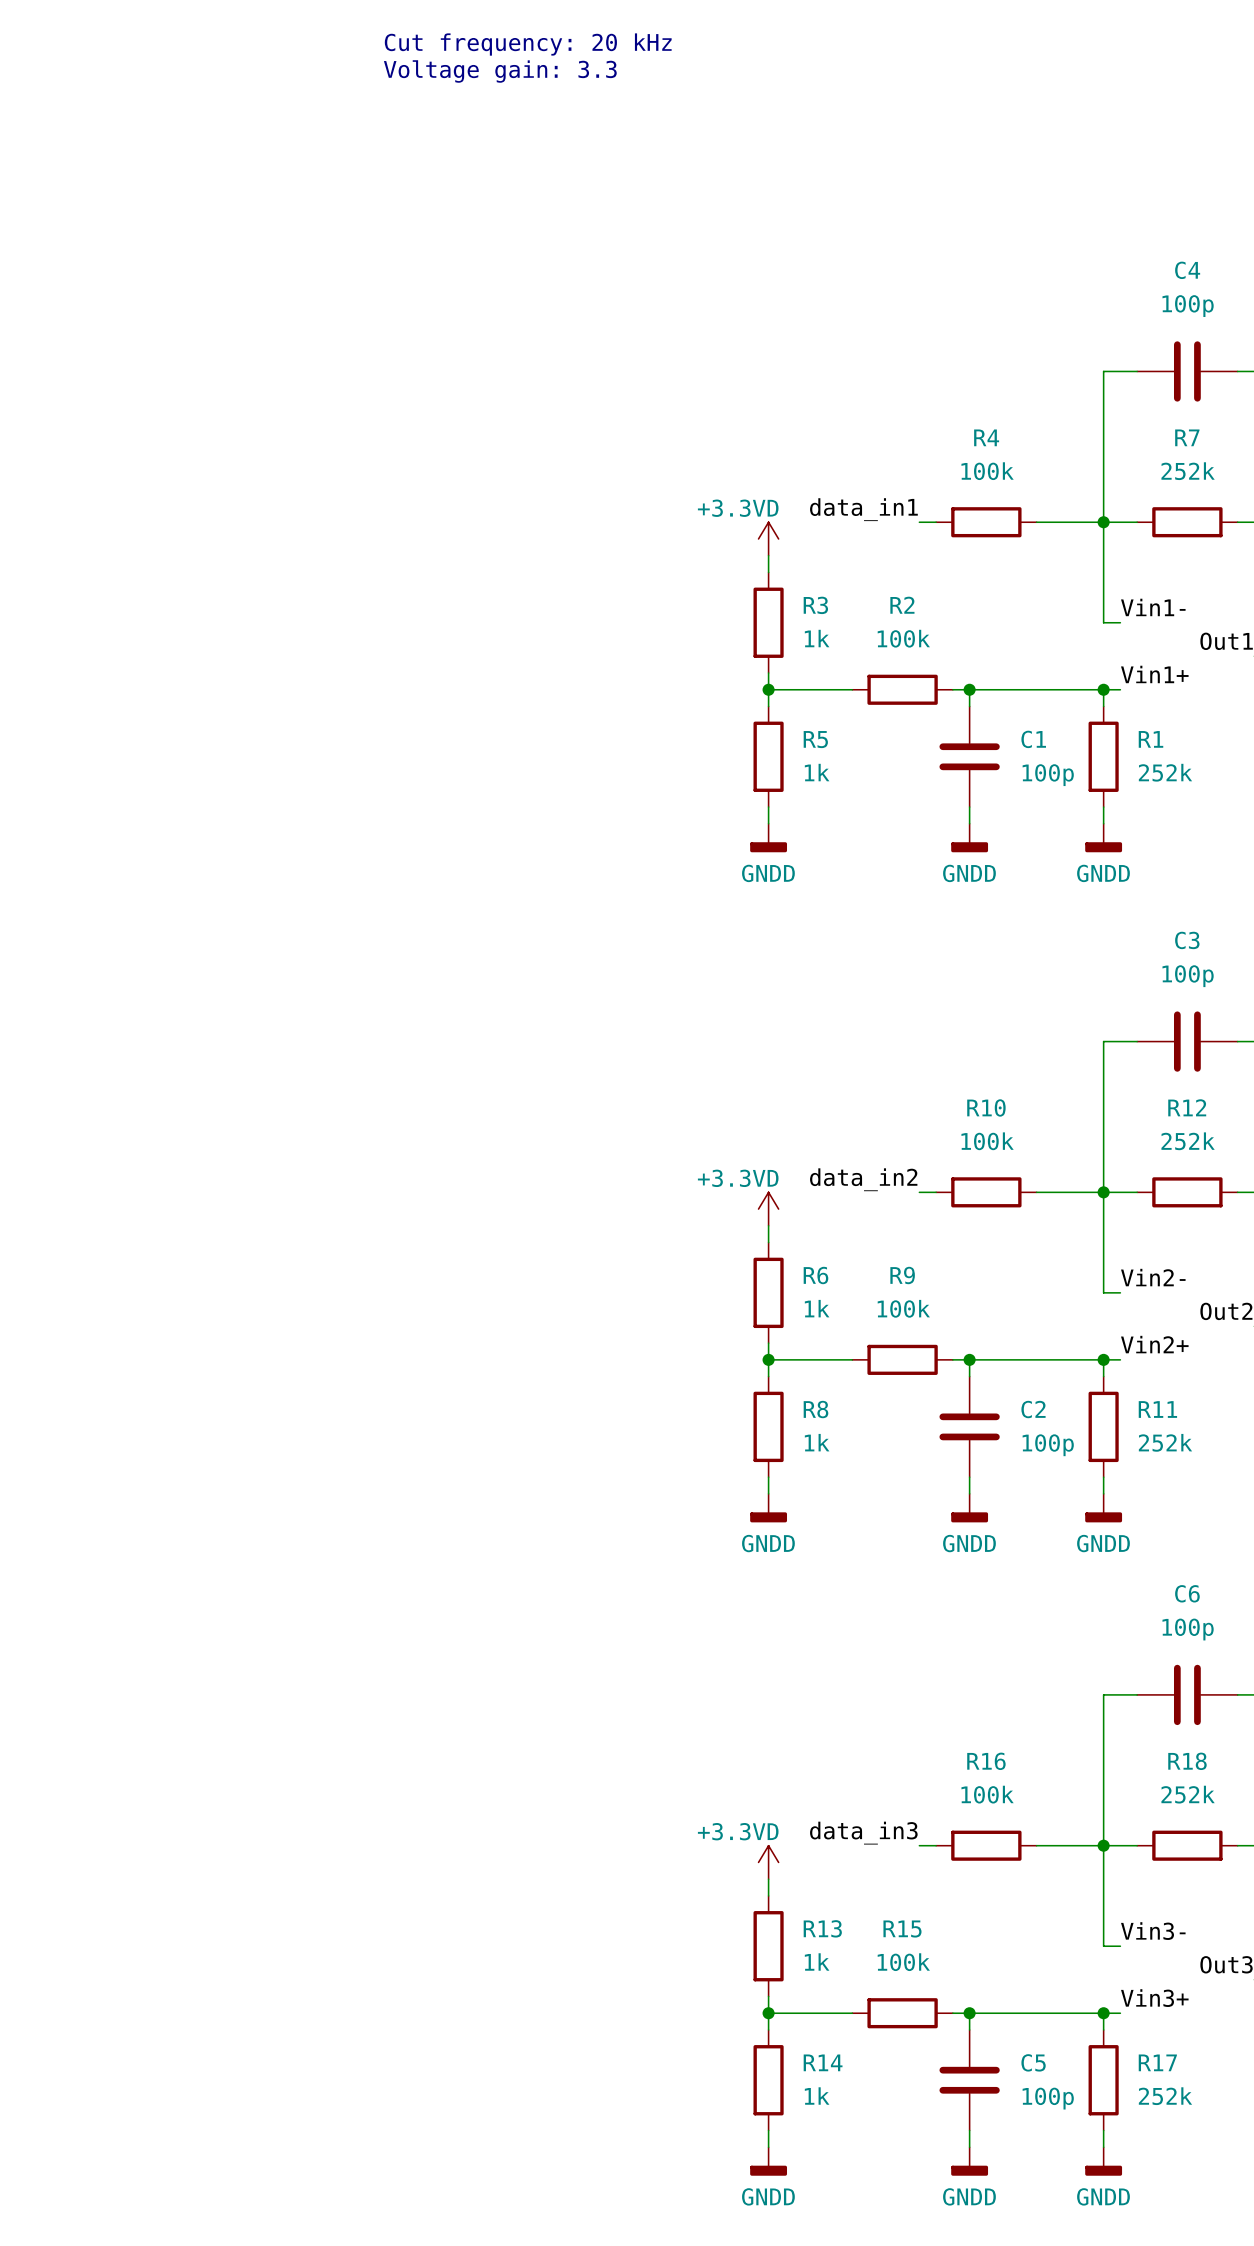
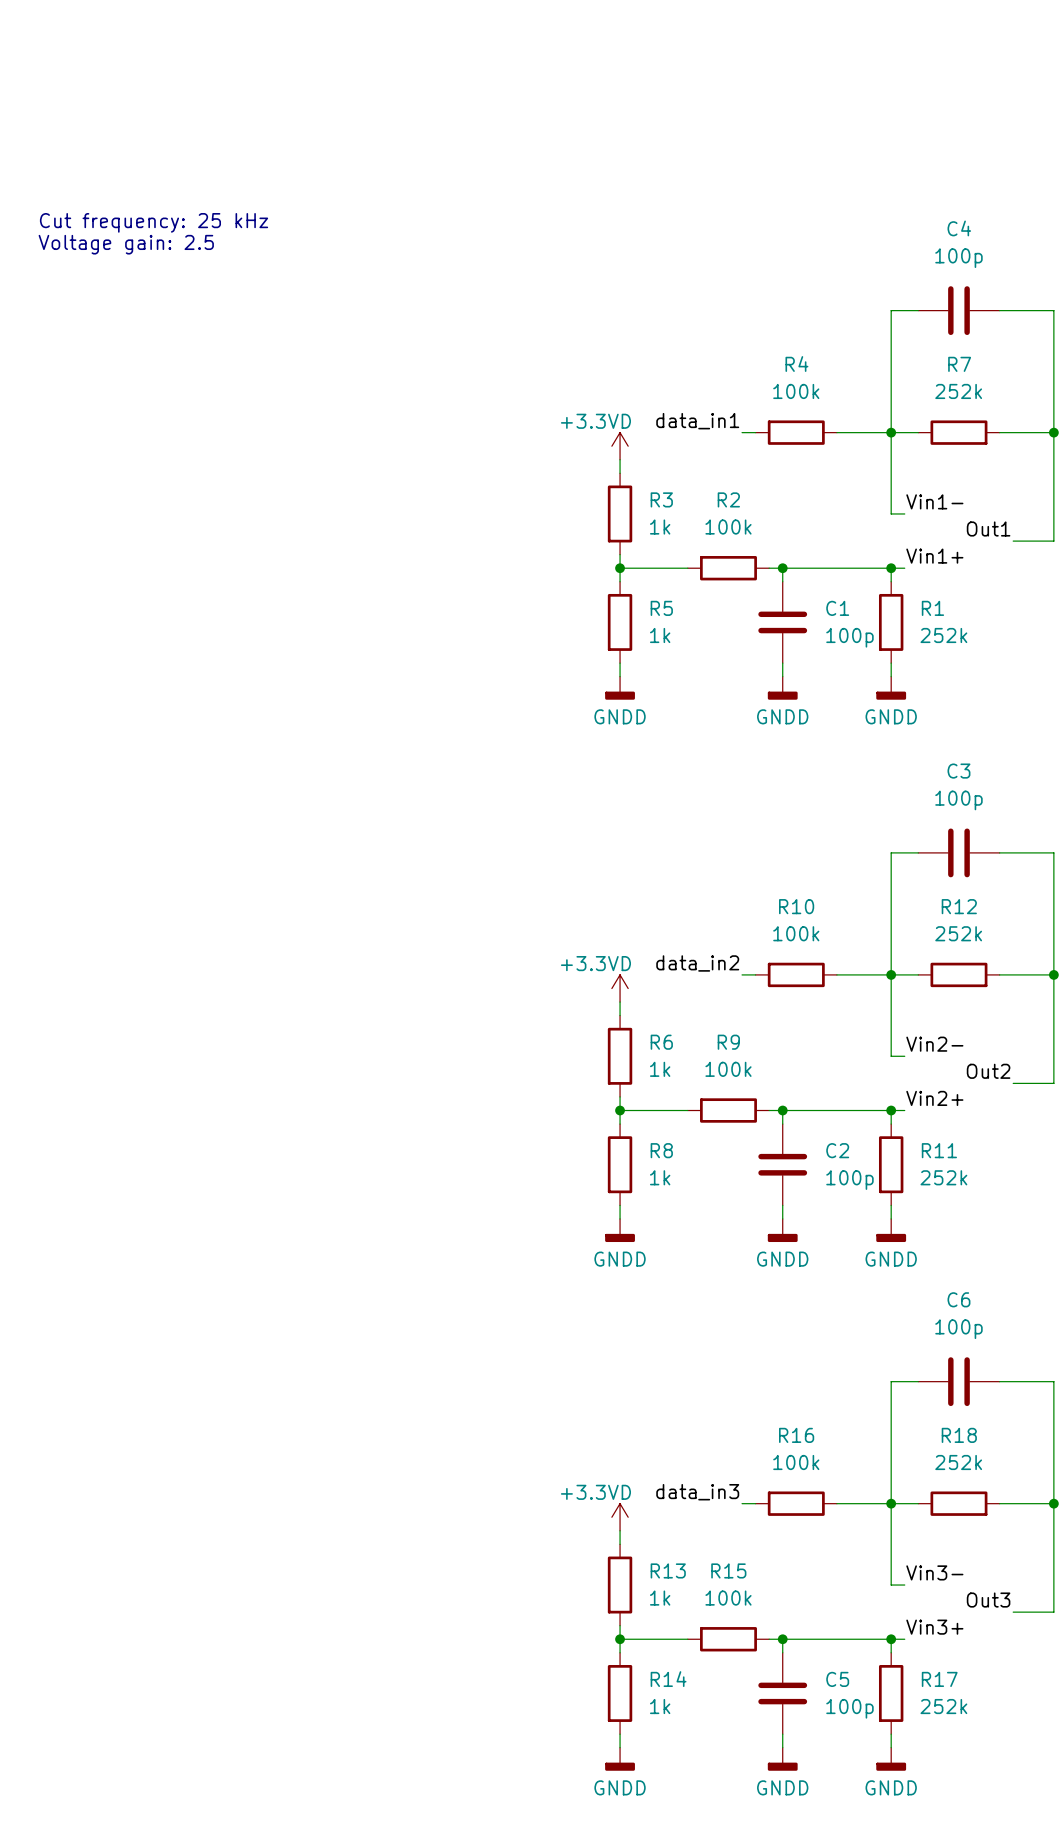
text: Cut frequency: 20 kHz (528, 44) -> none
text: Voltage gain: 3.3 (500, 71) -> none
text: none -> Cut frequency: 25 kHz (154, 222)
text: none -> Voltage gain: 2.5 (126, 244)

